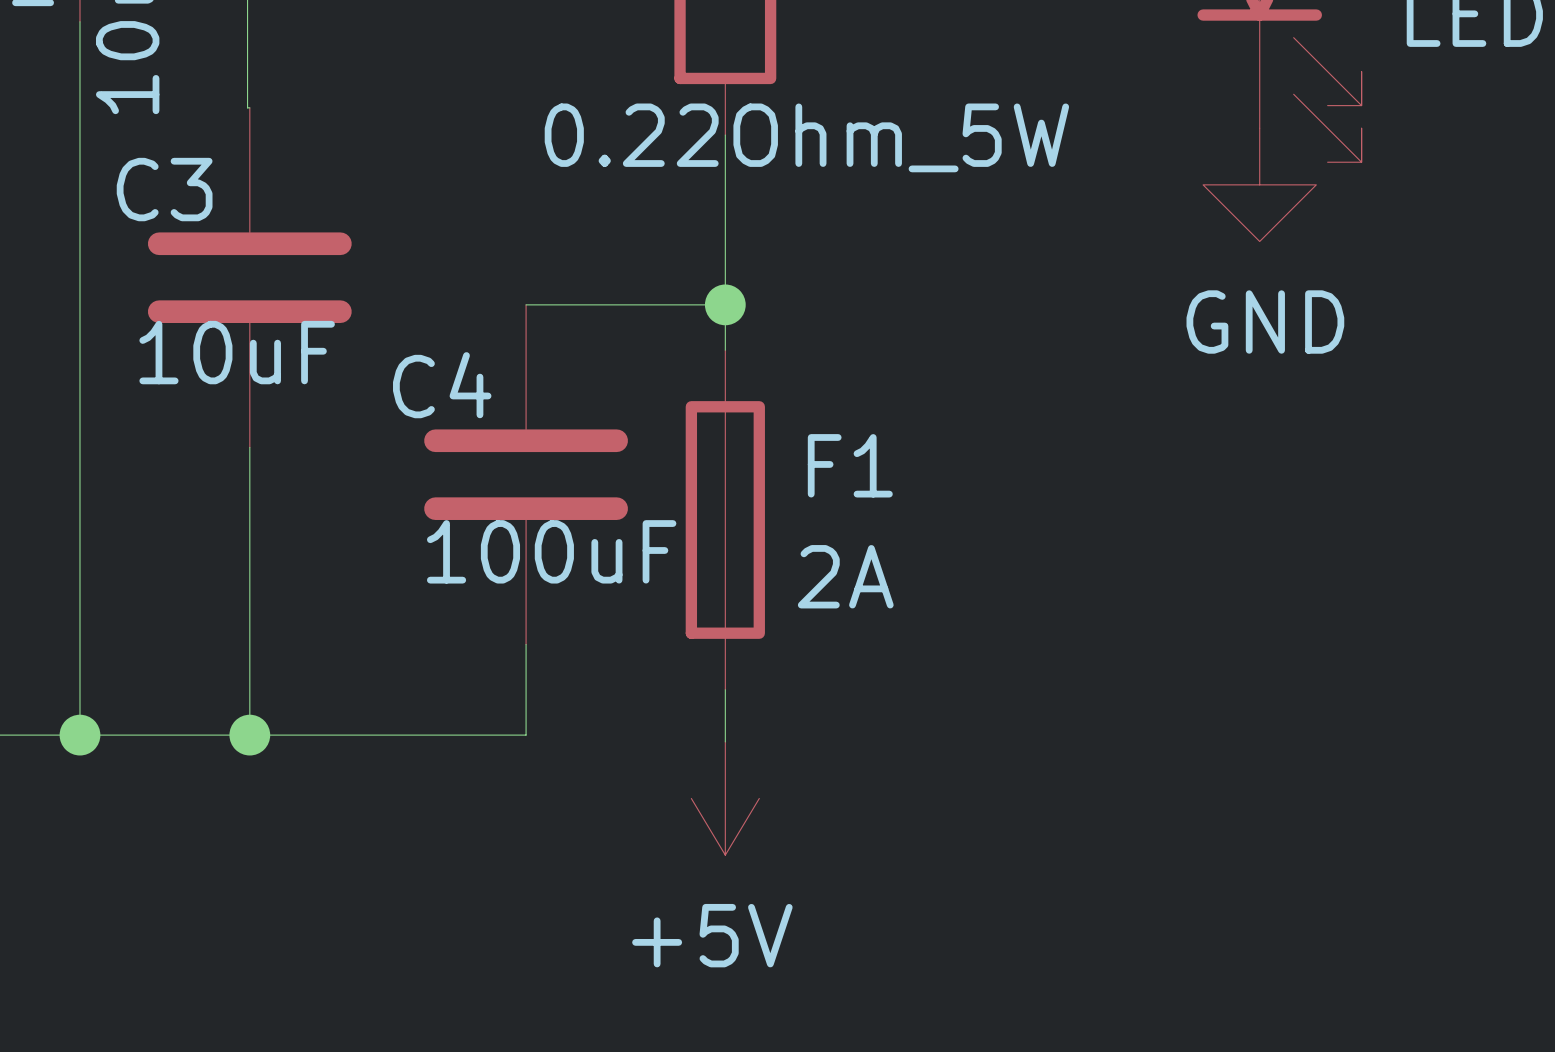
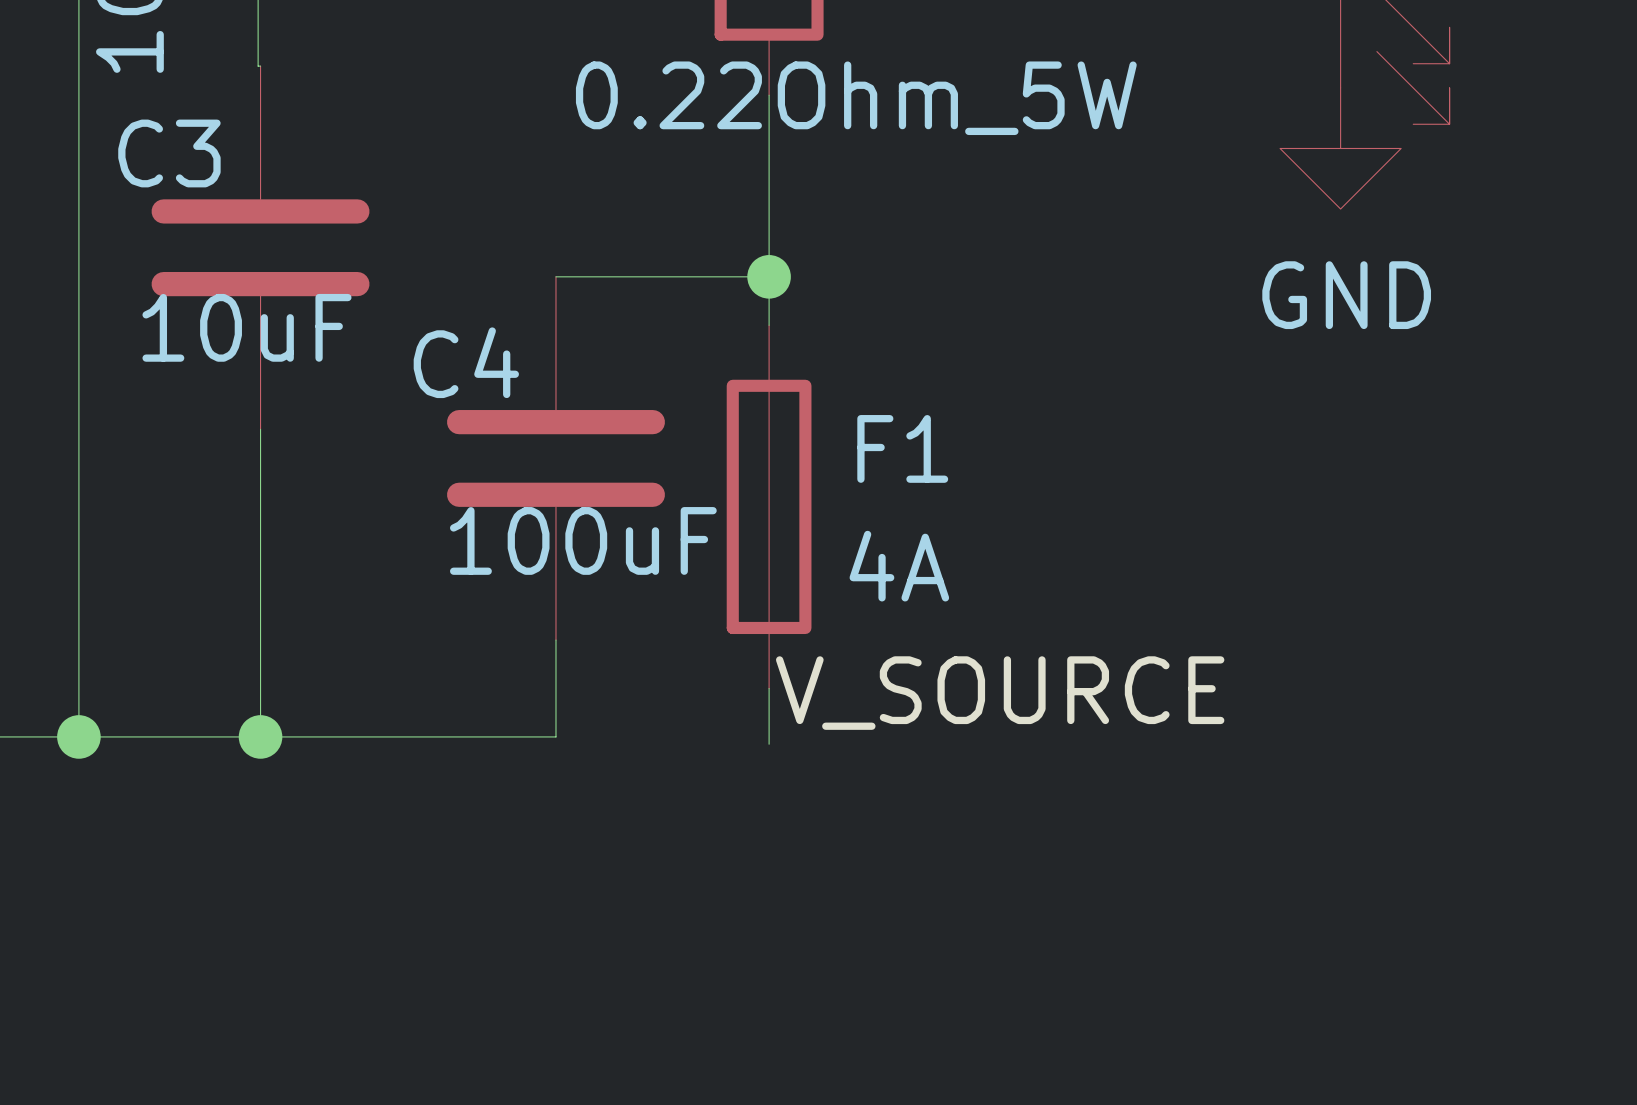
F1 value: 2A (845, 576) -> 4A (899, 566)
label: none -> V_SOURCE (1000, 693)
power symbol: +5V (725, 798) -> none

